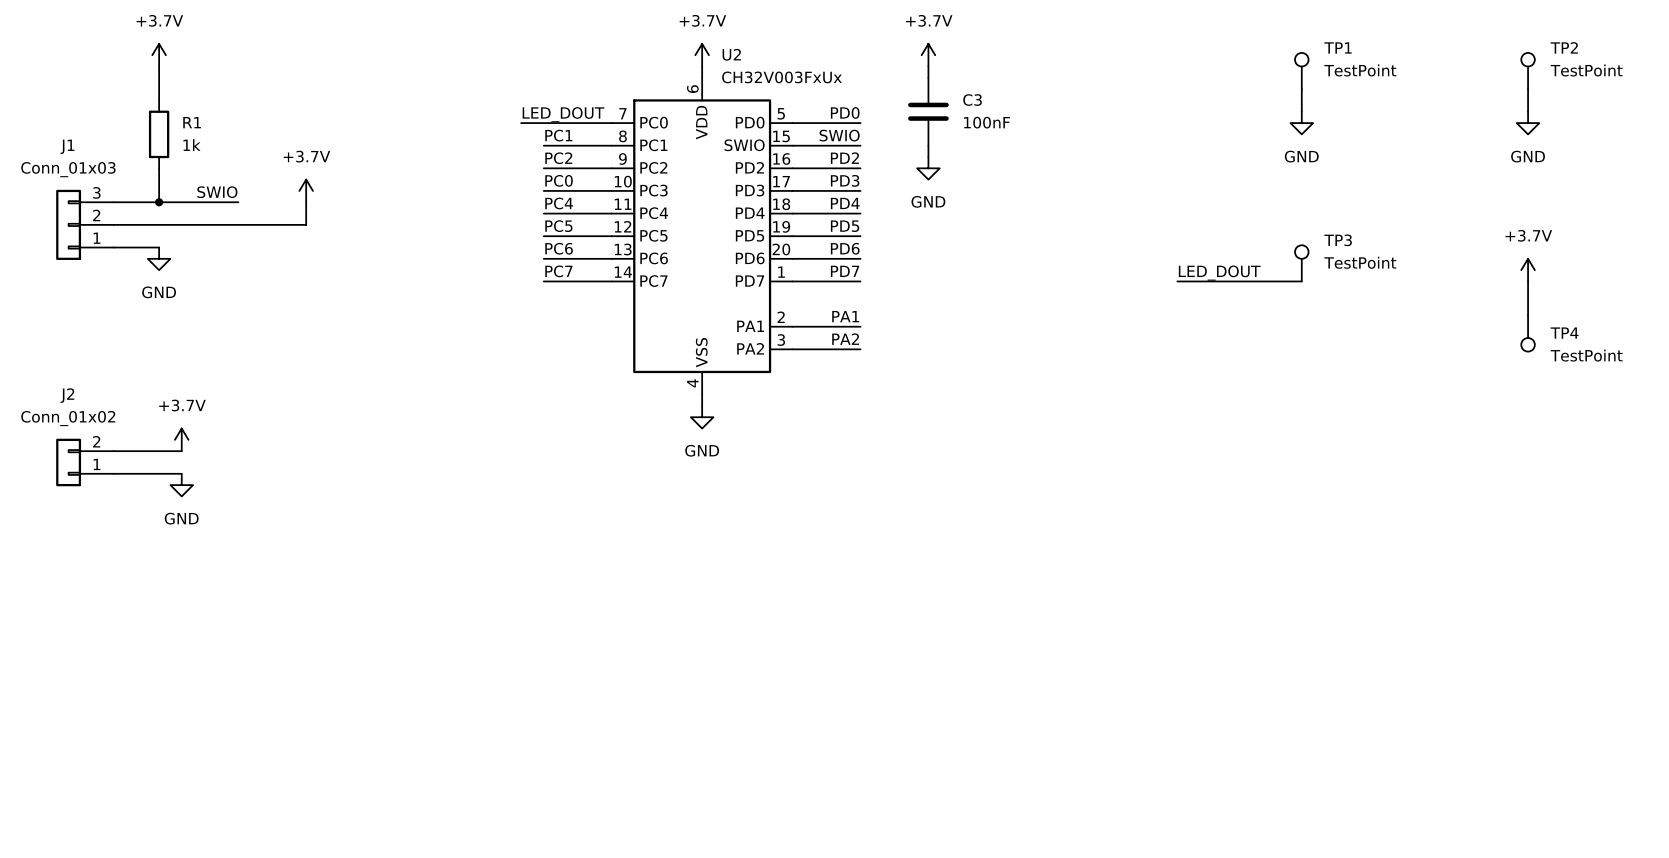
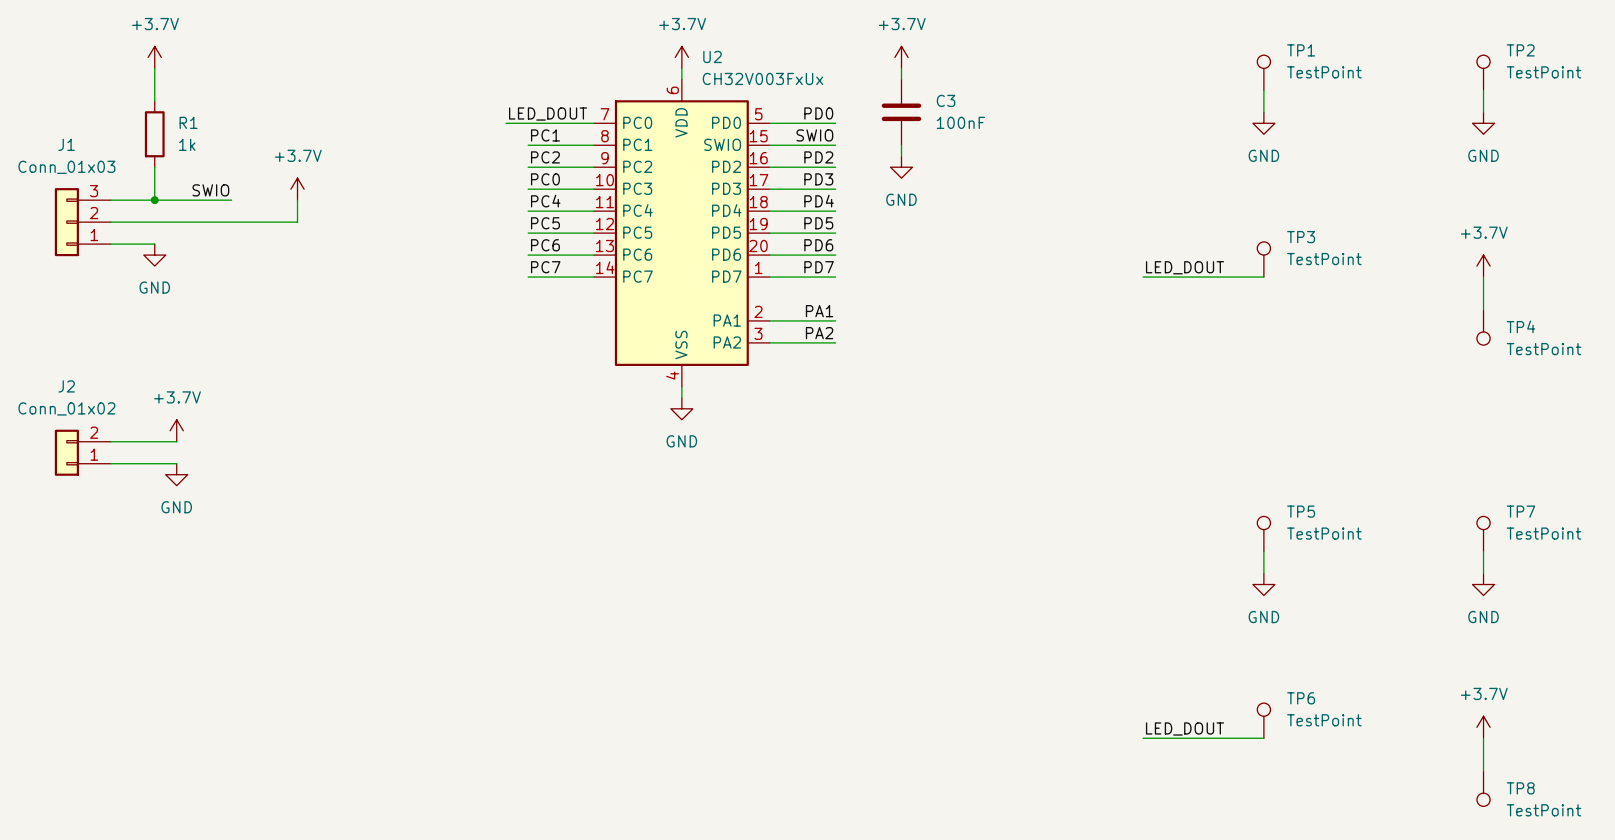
TP5: none -> TestPoint (1263, 534)
TP7: none -> TestPoint (1483, 534)
wire: none -> (1263, 551) (1263, 573)
wire: none -> (1483, 551) (1483, 573)
power symbol: none -> GND (1263, 584)
power symbol: none -> GND (1483, 584)
TP6: none -> TestPoint (1263, 720)
power symbol: none -> +3.7V (1483, 727)
label: none -> LED_DOUT (1185, 728)
wire: none -> (1143, 738) (1263, 738)
wire: none -> (1483, 738) (1483, 771)
TP8: none -> TestPoint (1483, 788)

